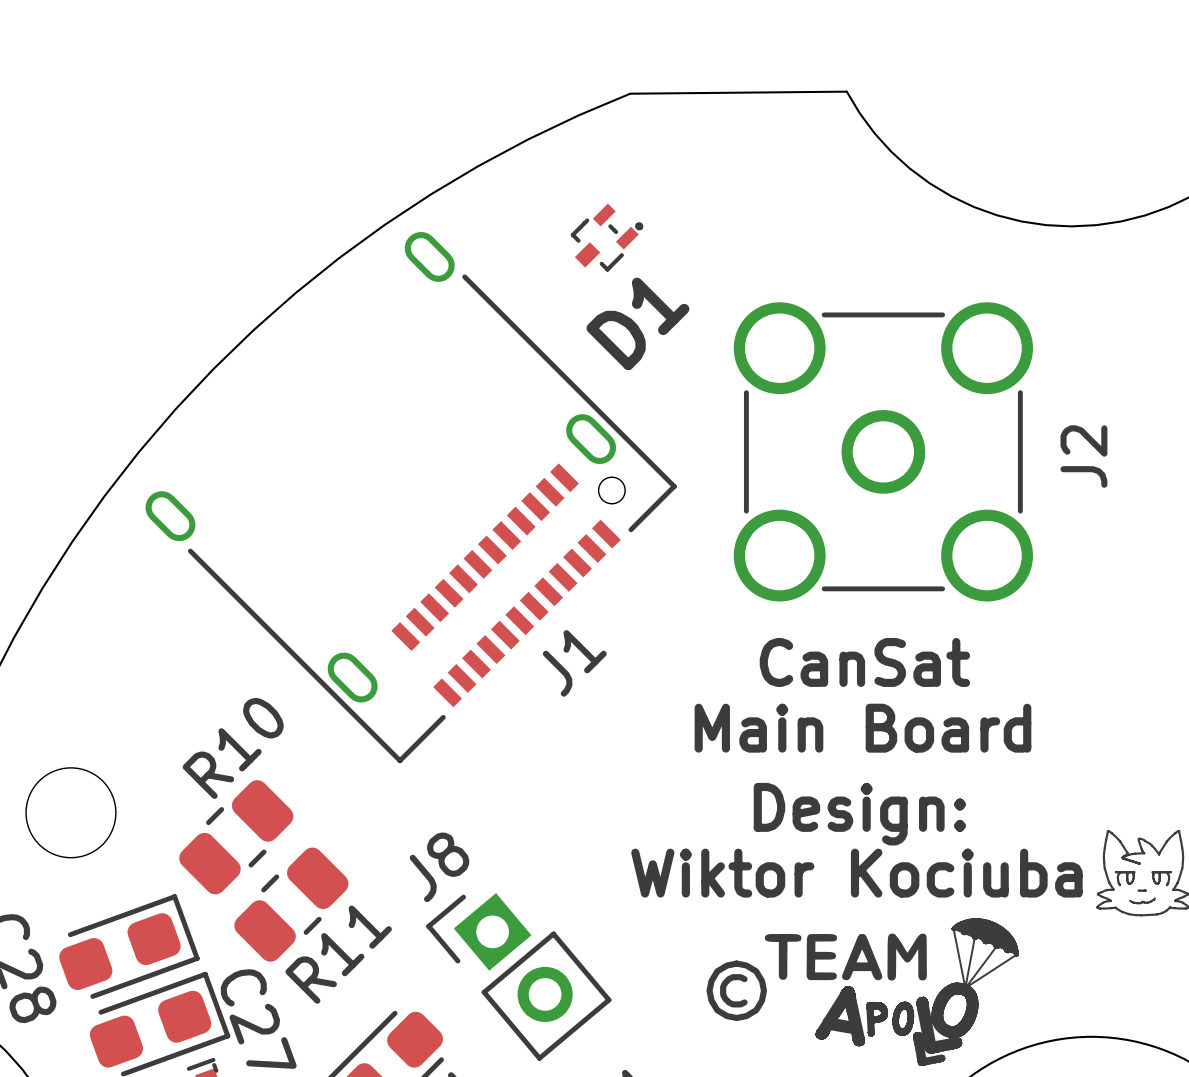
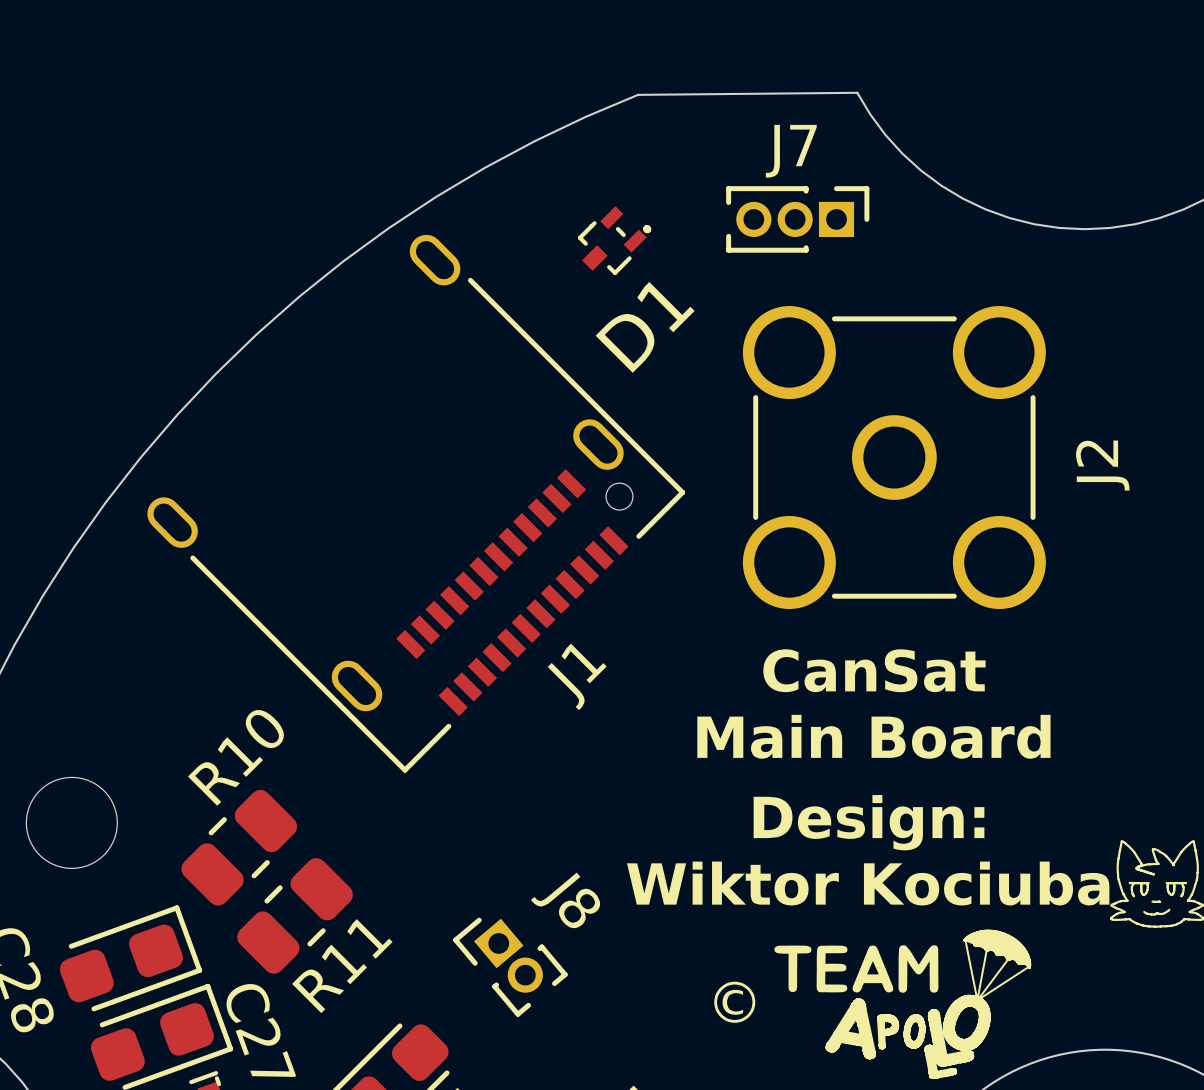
J7: none -> (797, 219)
J8 name position: J8 (439, 867) -> J8 (565, 900)
J8 footprint: [426, 893, 612, 1061] -> [453, 917, 568, 1017]

